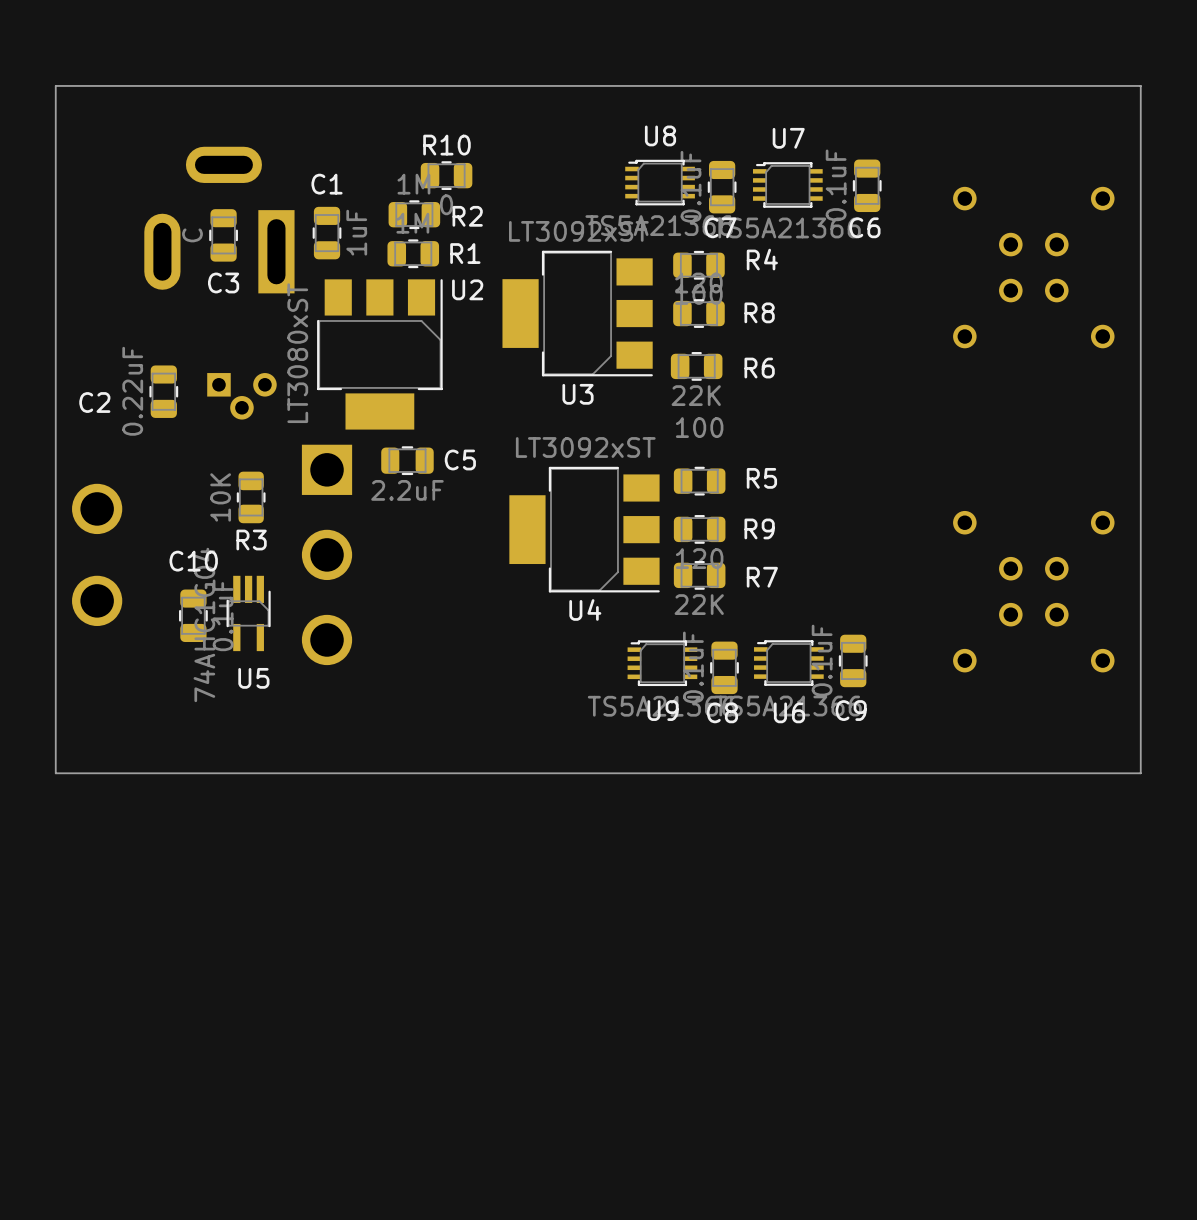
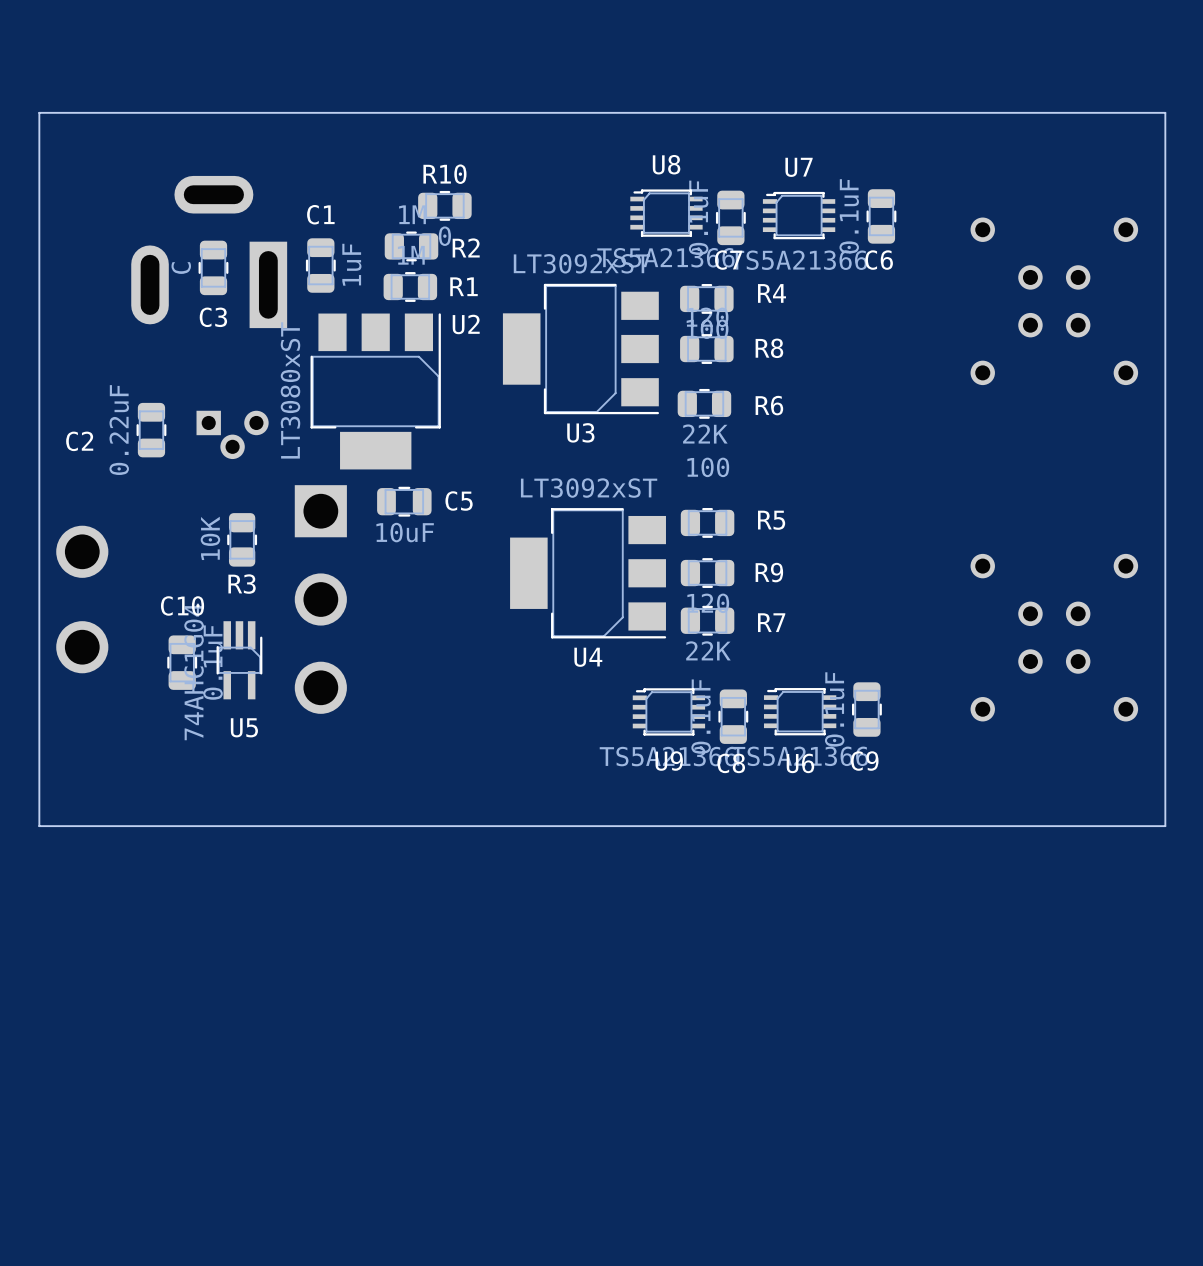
C5 value: 2.2uF (407, 490) -> 10uF (405, 532)

